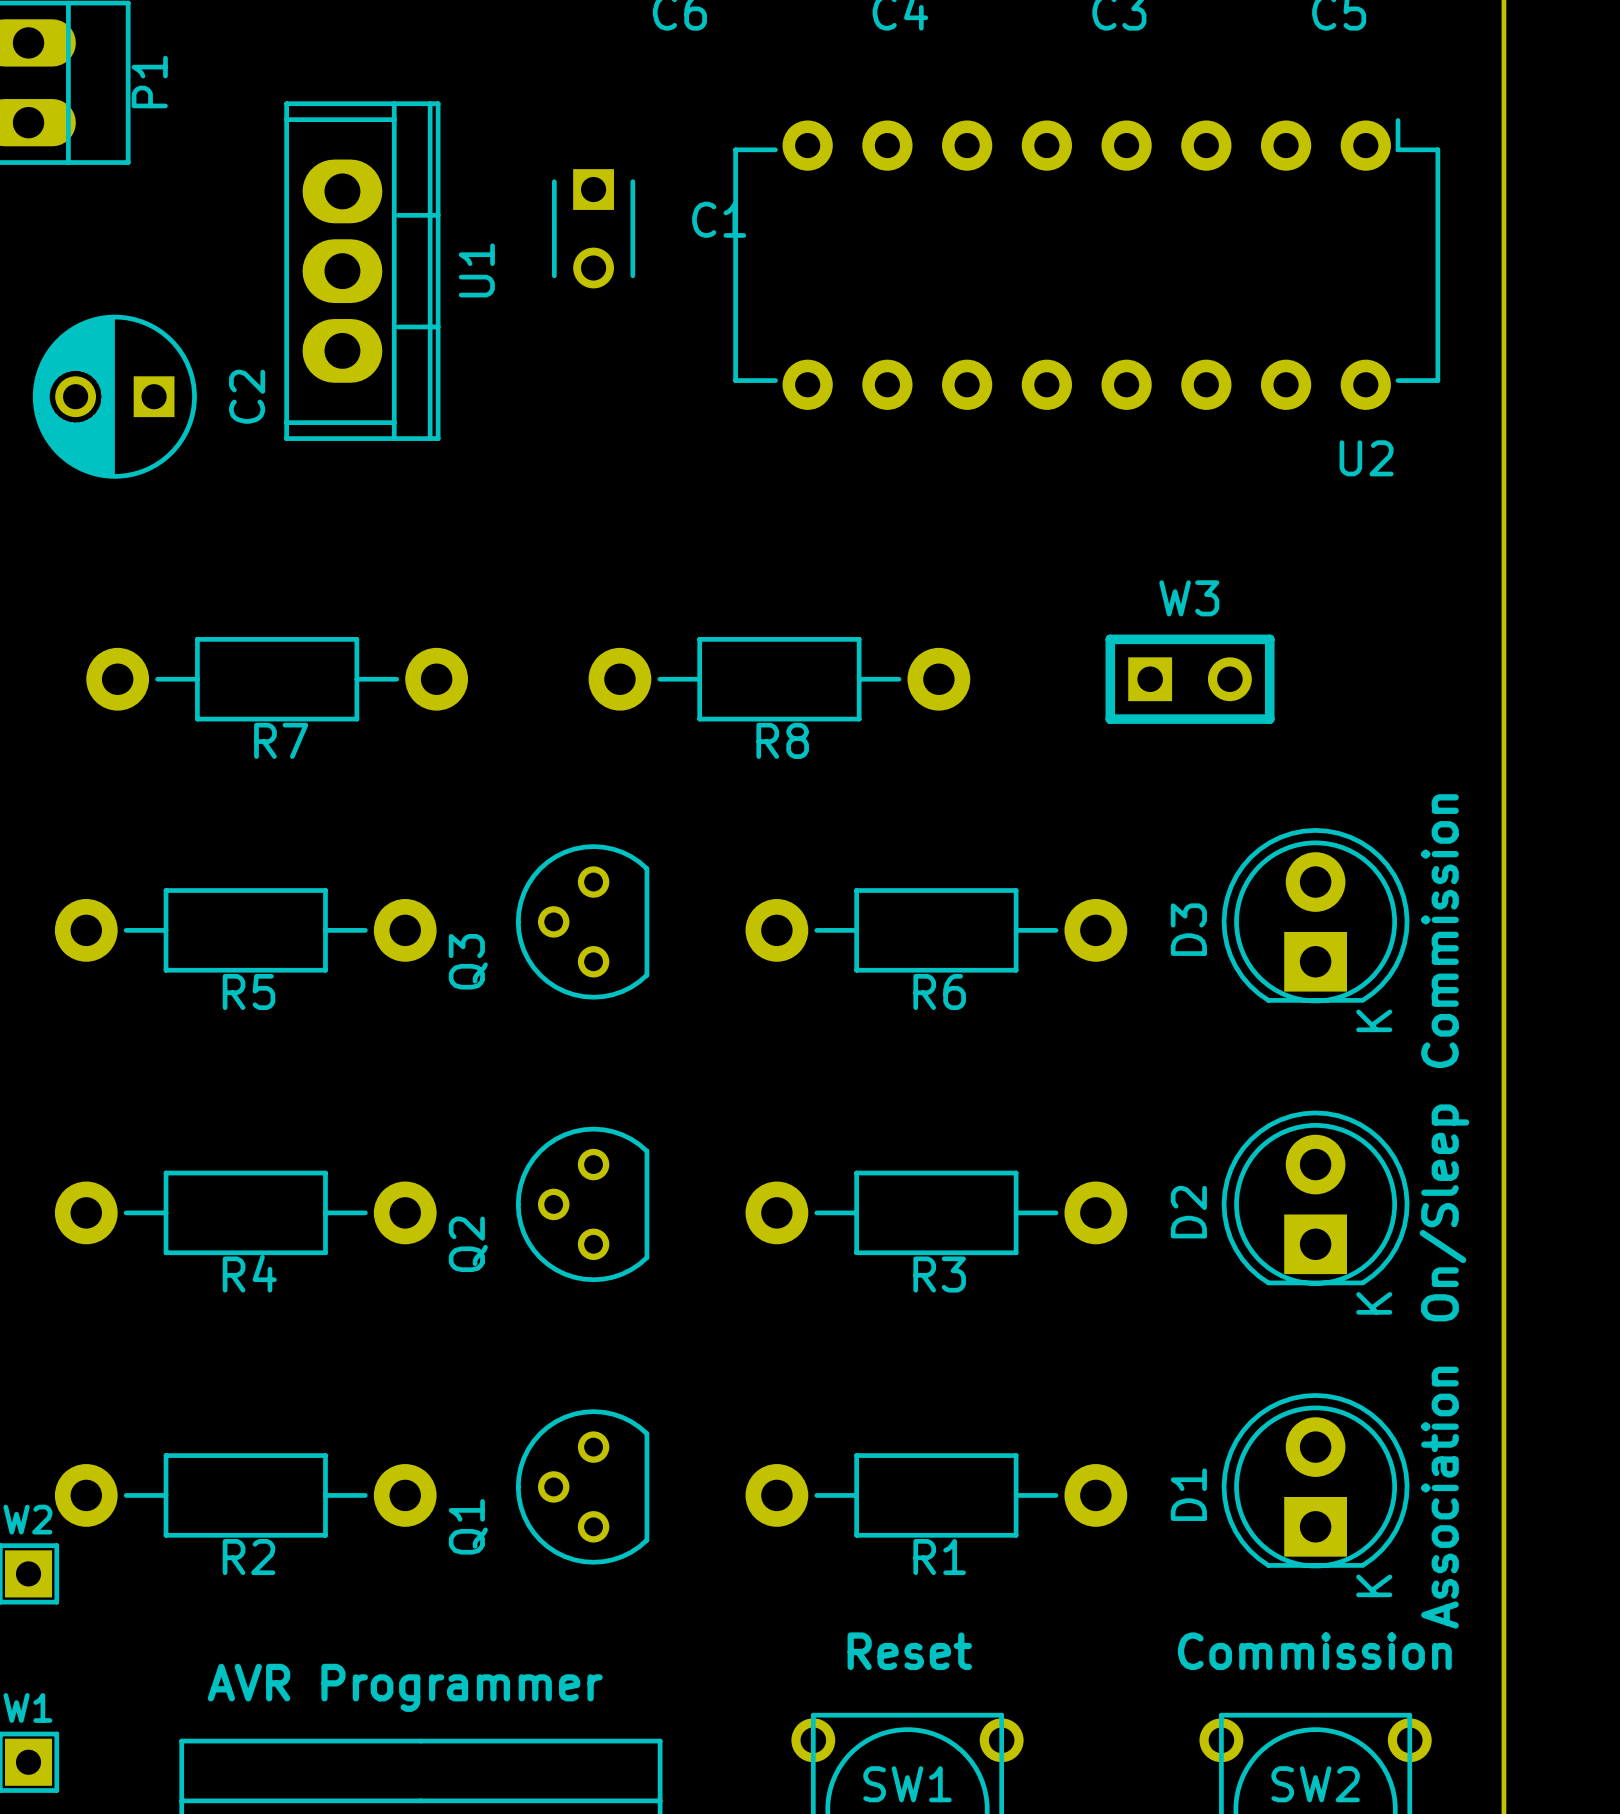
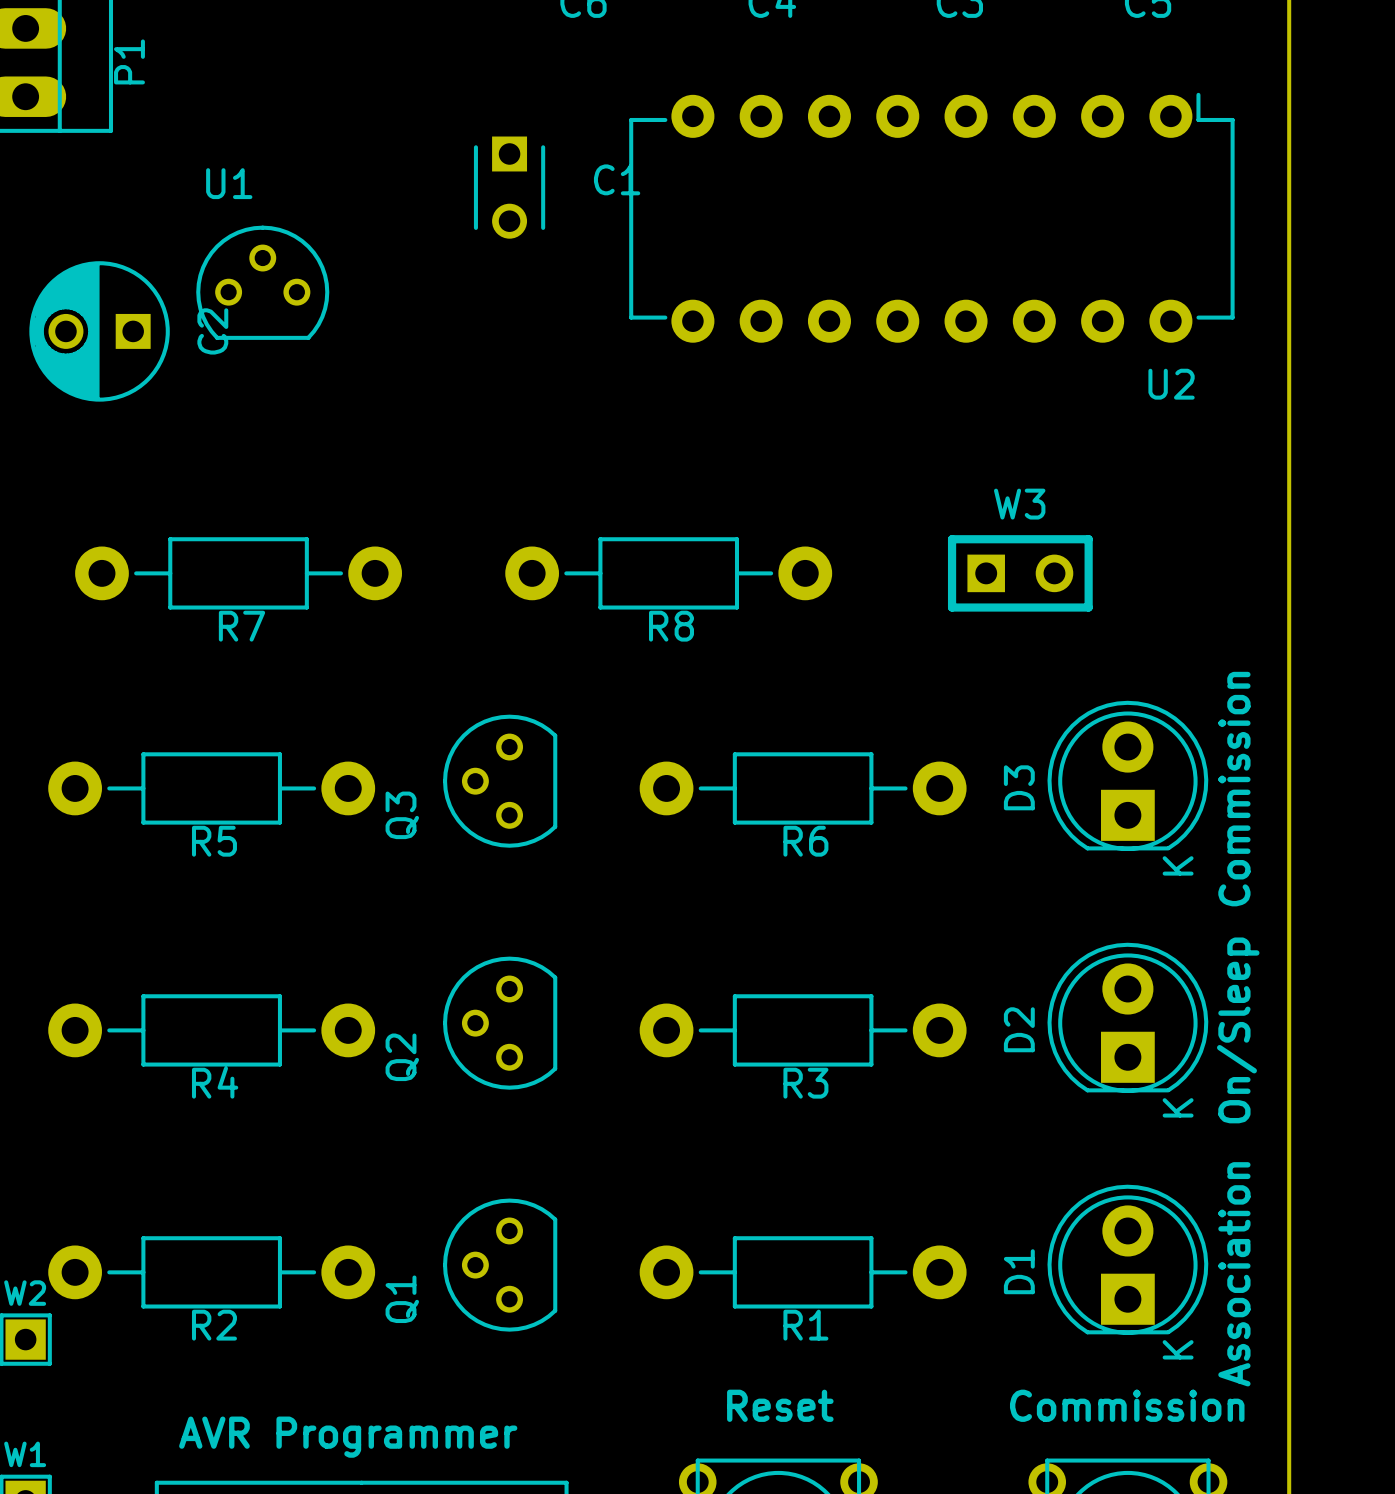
U1 footprint: [284, 101, 441, 441] -> [196, 225, 330, 340]
U1 name position: U1 (476, 270) -> U1 (229, 183)

